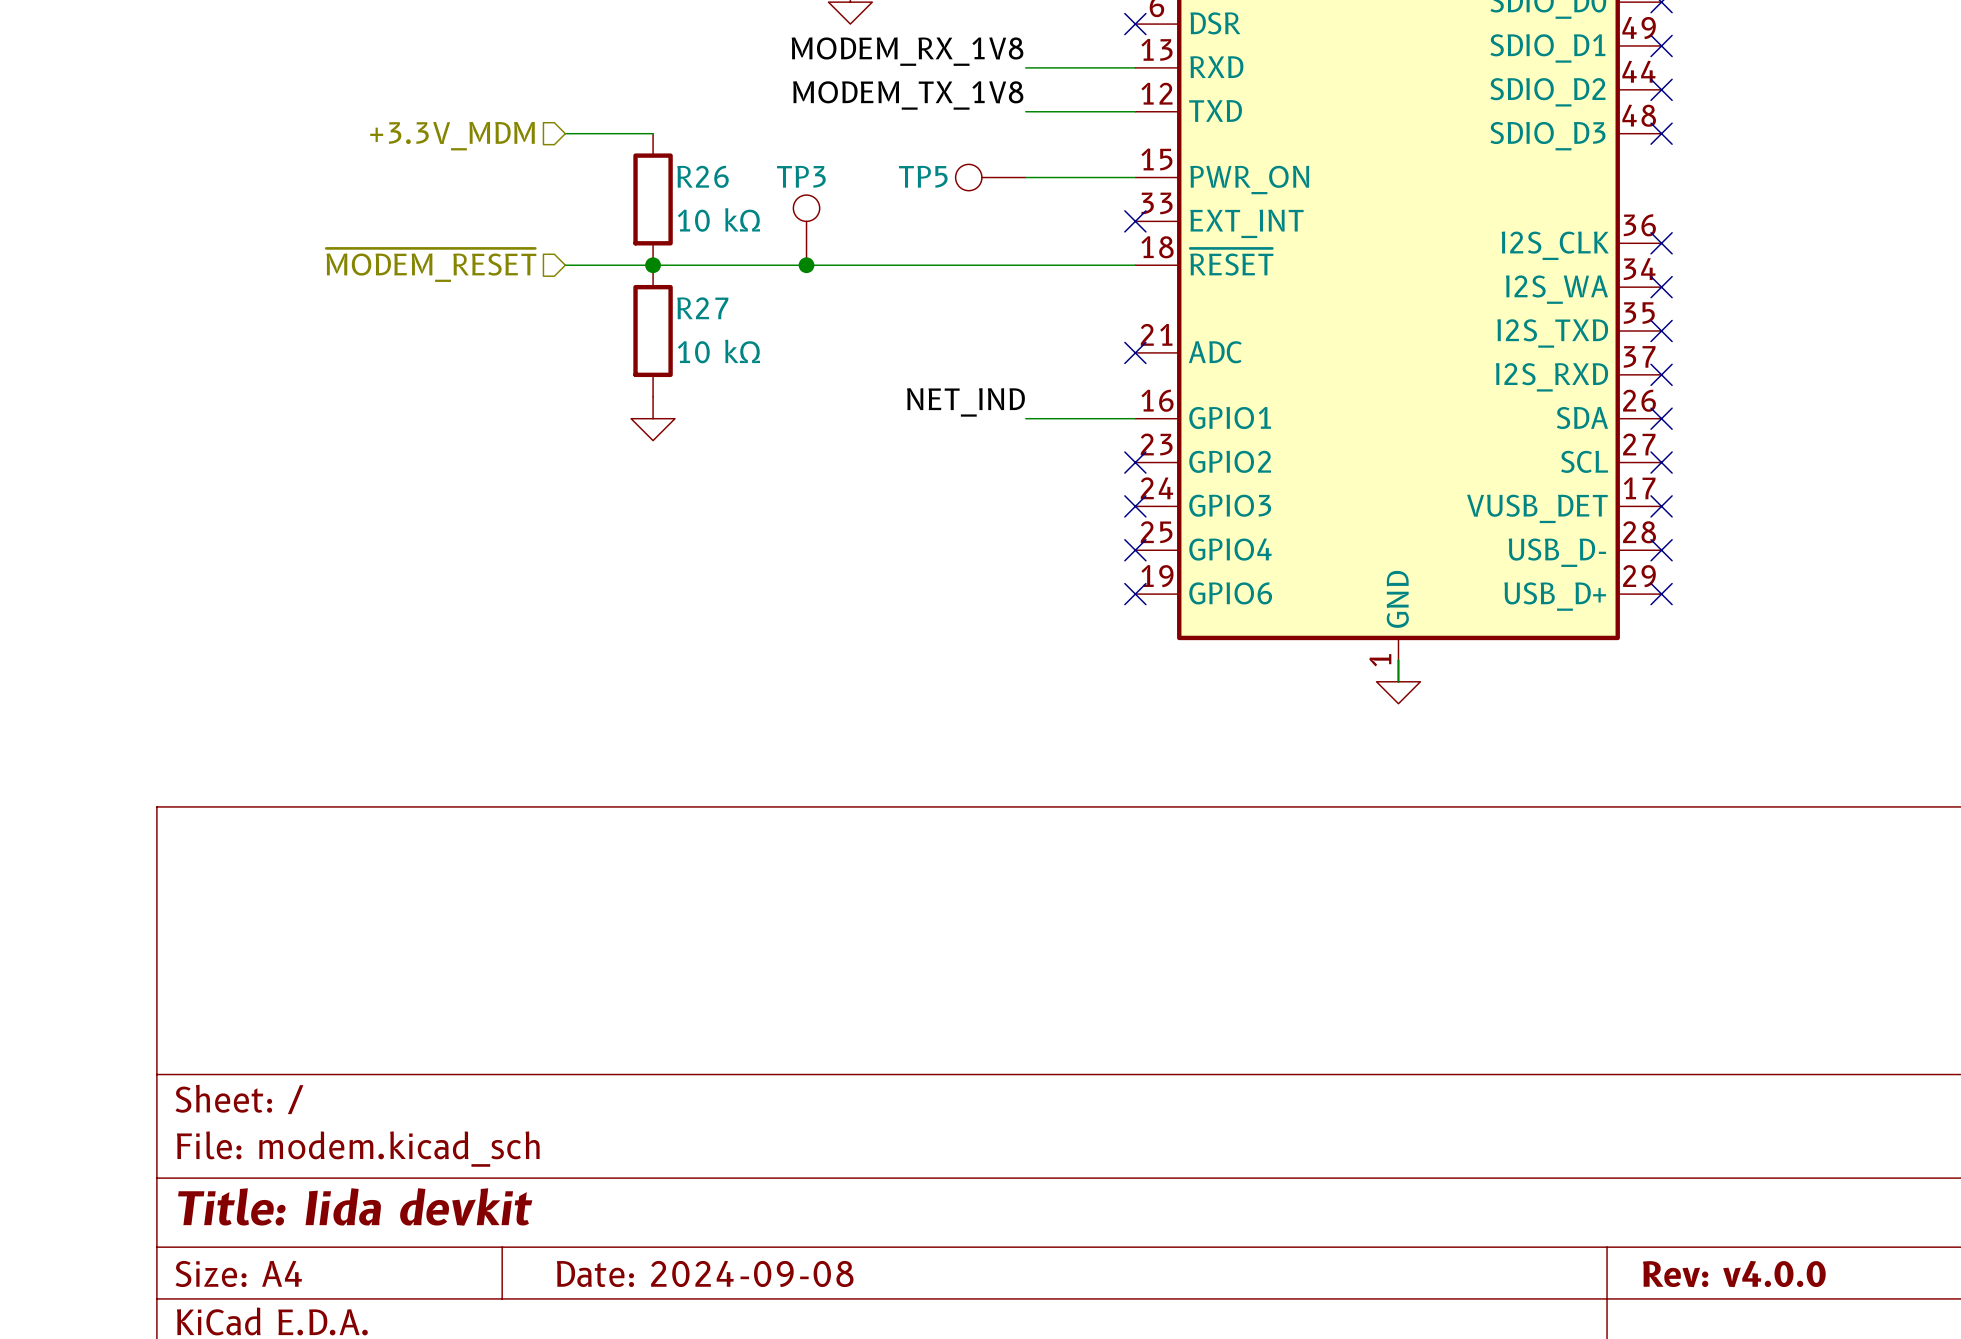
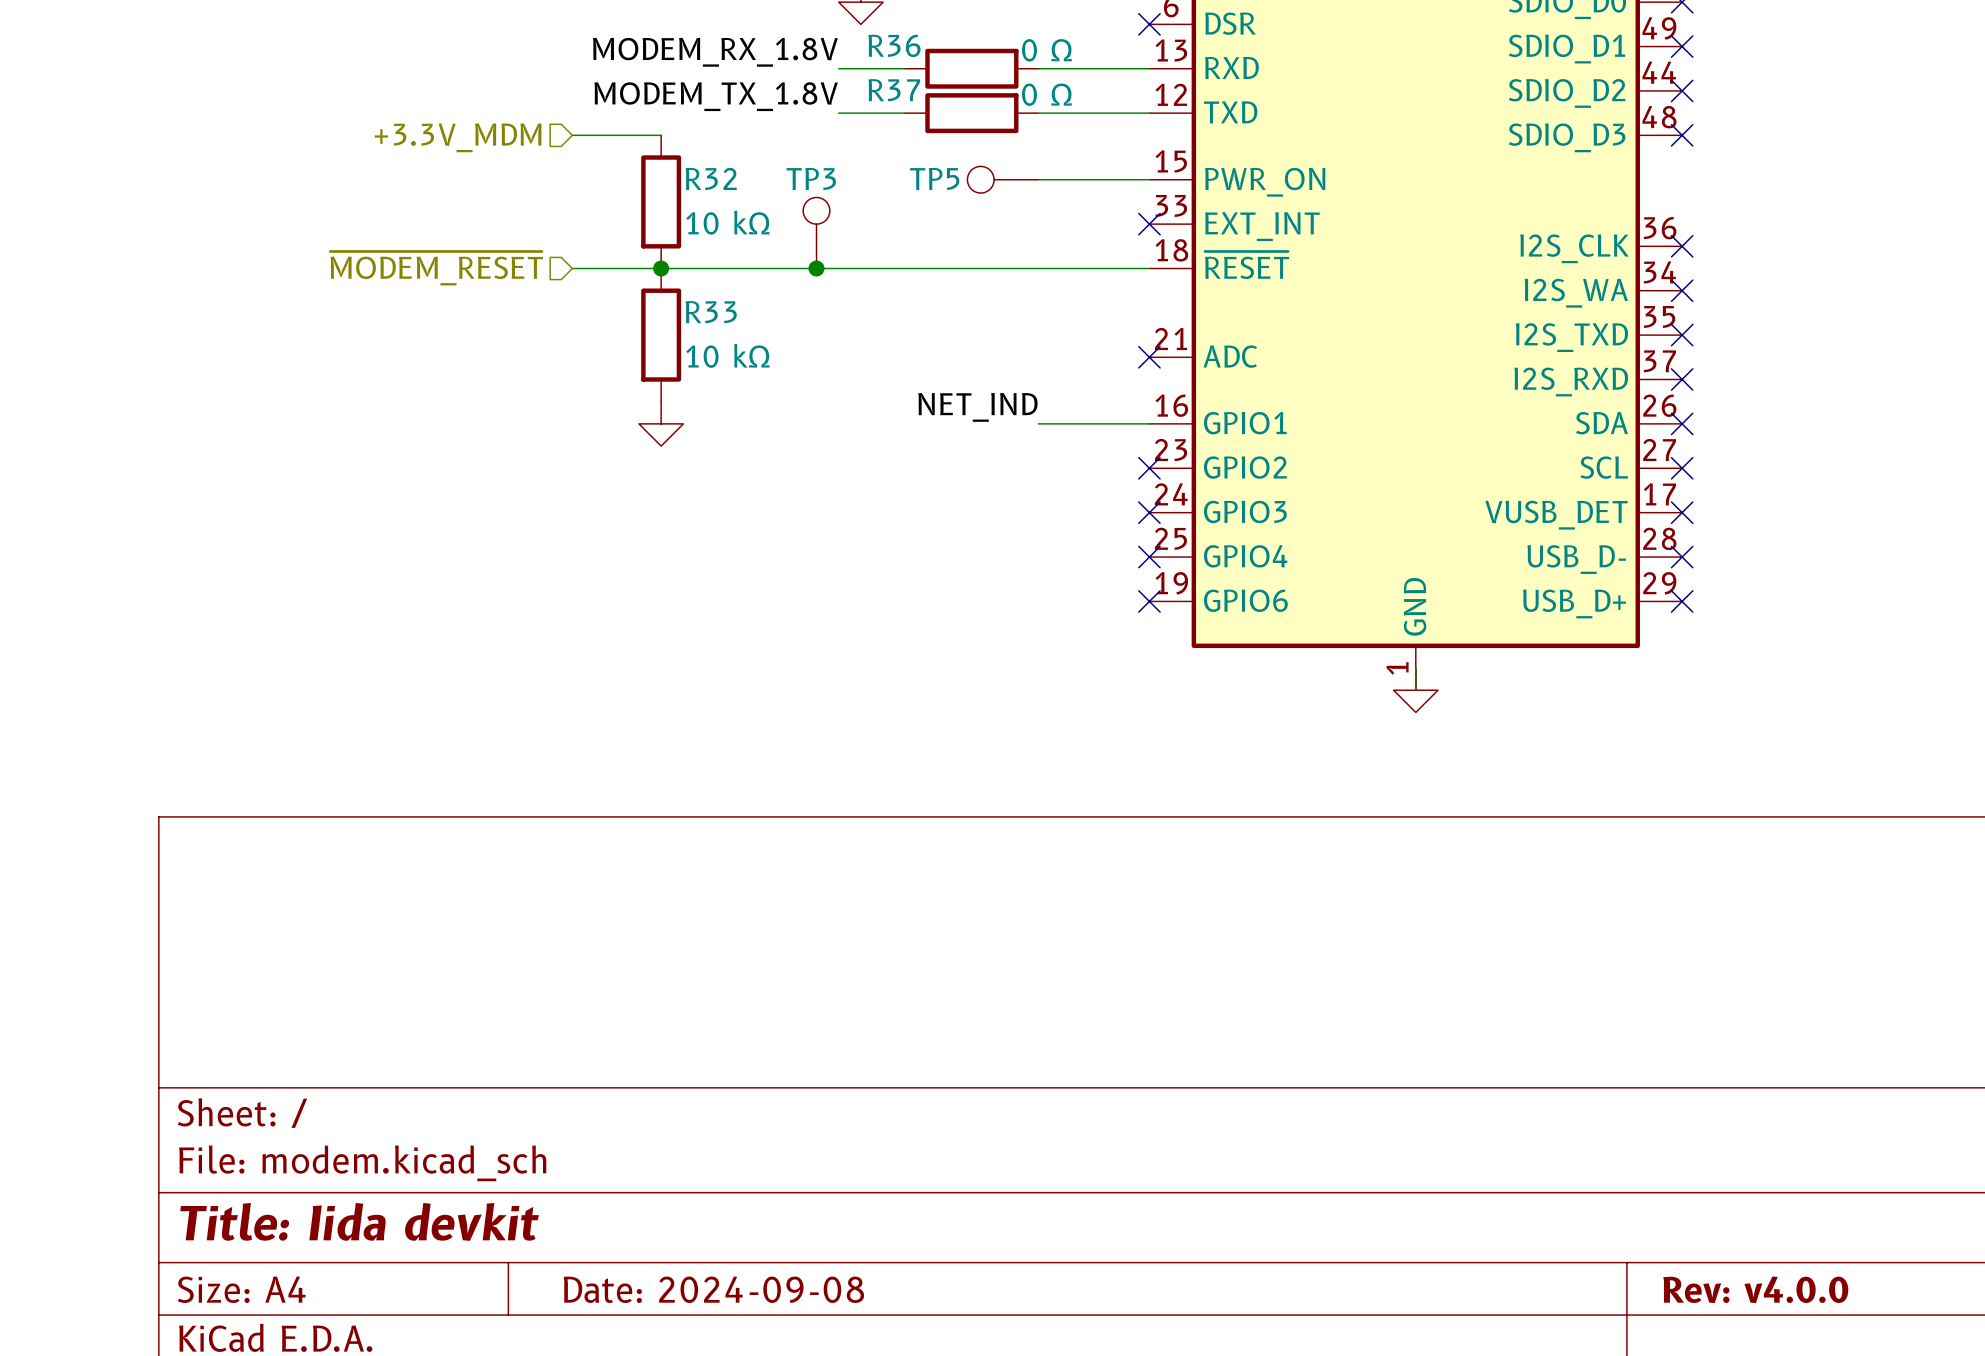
label: none -> MODEM_RX_1.8V (715, 52)
label: MODEM_RX_1V8 (907, 51) -> none
wire: none -> (838, 68) (905, 68)
R36: none -> 0 Ω (971, 68)
label: none -> MODEM_TX_1.8V (716, 96)
label: MODEM_TX_1V8 (908, 95) -> none
wire: none -> (838, 113) (905, 113)
R37: none -> 0 Ω (971, 113)
R26 name: R26 (702, 176) -> R32 (711, 178)
R27 name: R27 (702, 308) -> R33 (711, 312)

